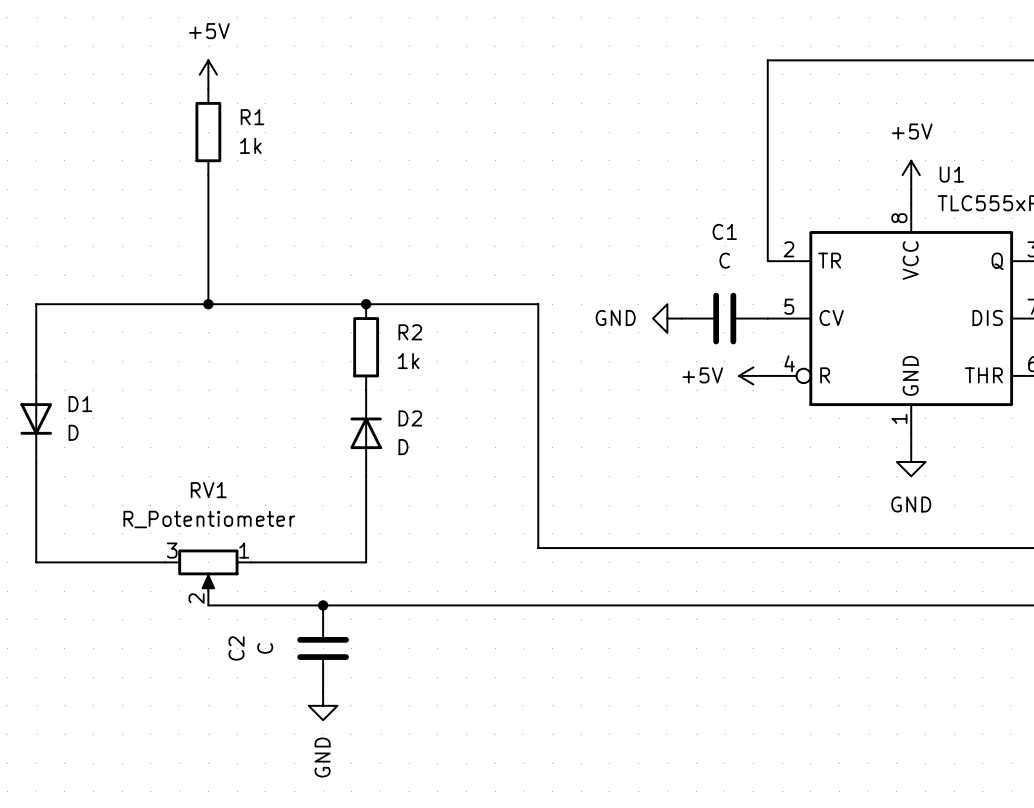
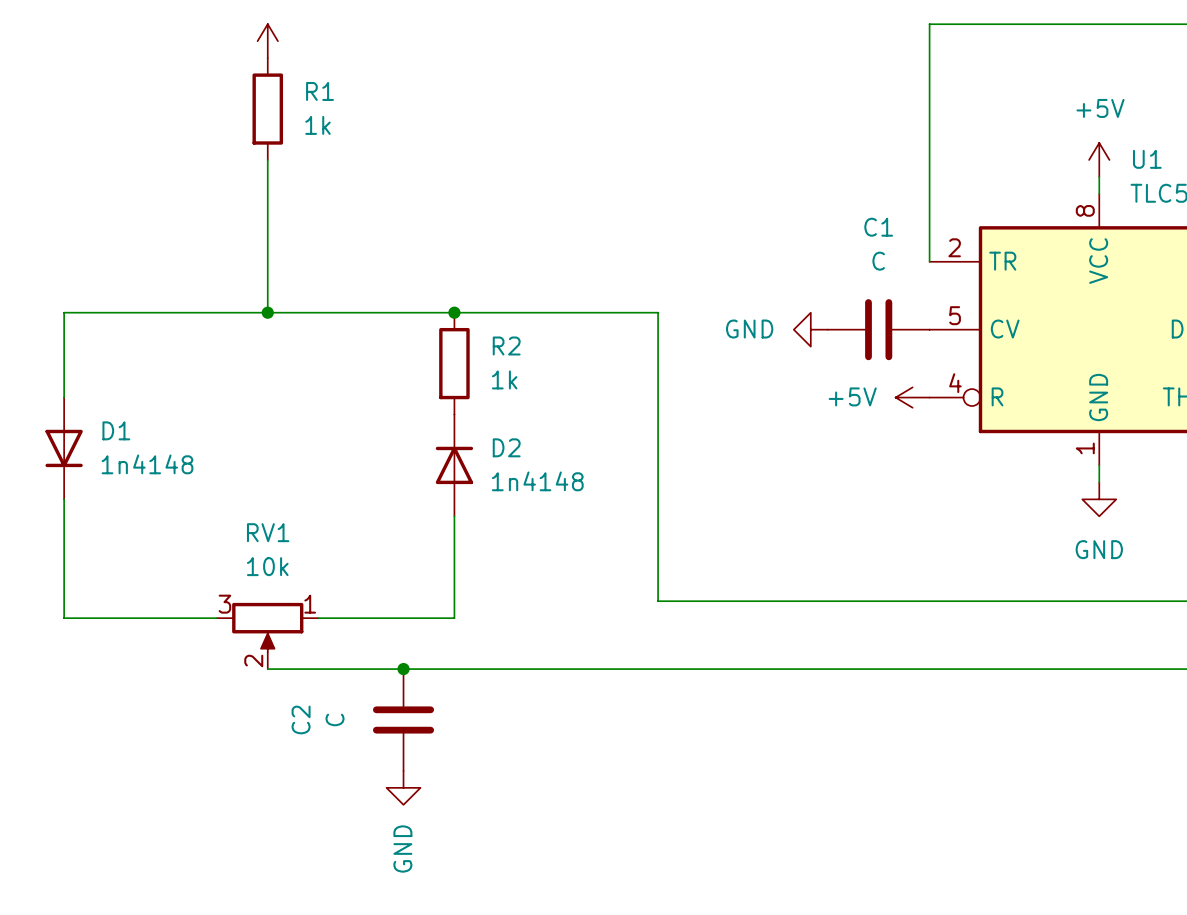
D1 value: D (73, 432) -> 1n4148 (147, 464)
D2 value: D (403, 447) -> 1n4148 (537, 481)
RV1 value: R_Potentiometer (209, 519) -> 10k (267, 566)

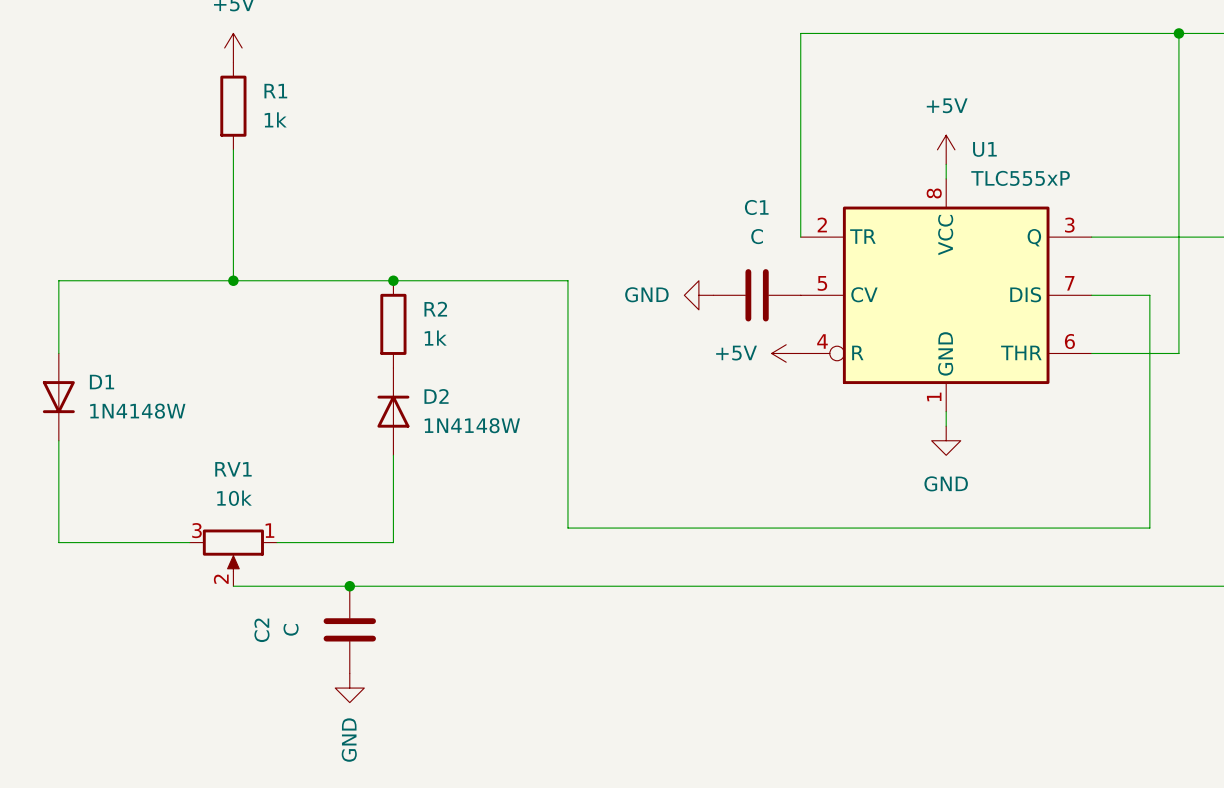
D1 value: 1n4148 (147, 464) -> 1N4148W (137, 411)
D2 value: 1n4148 (537, 481) -> 1N4148W (472, 425)

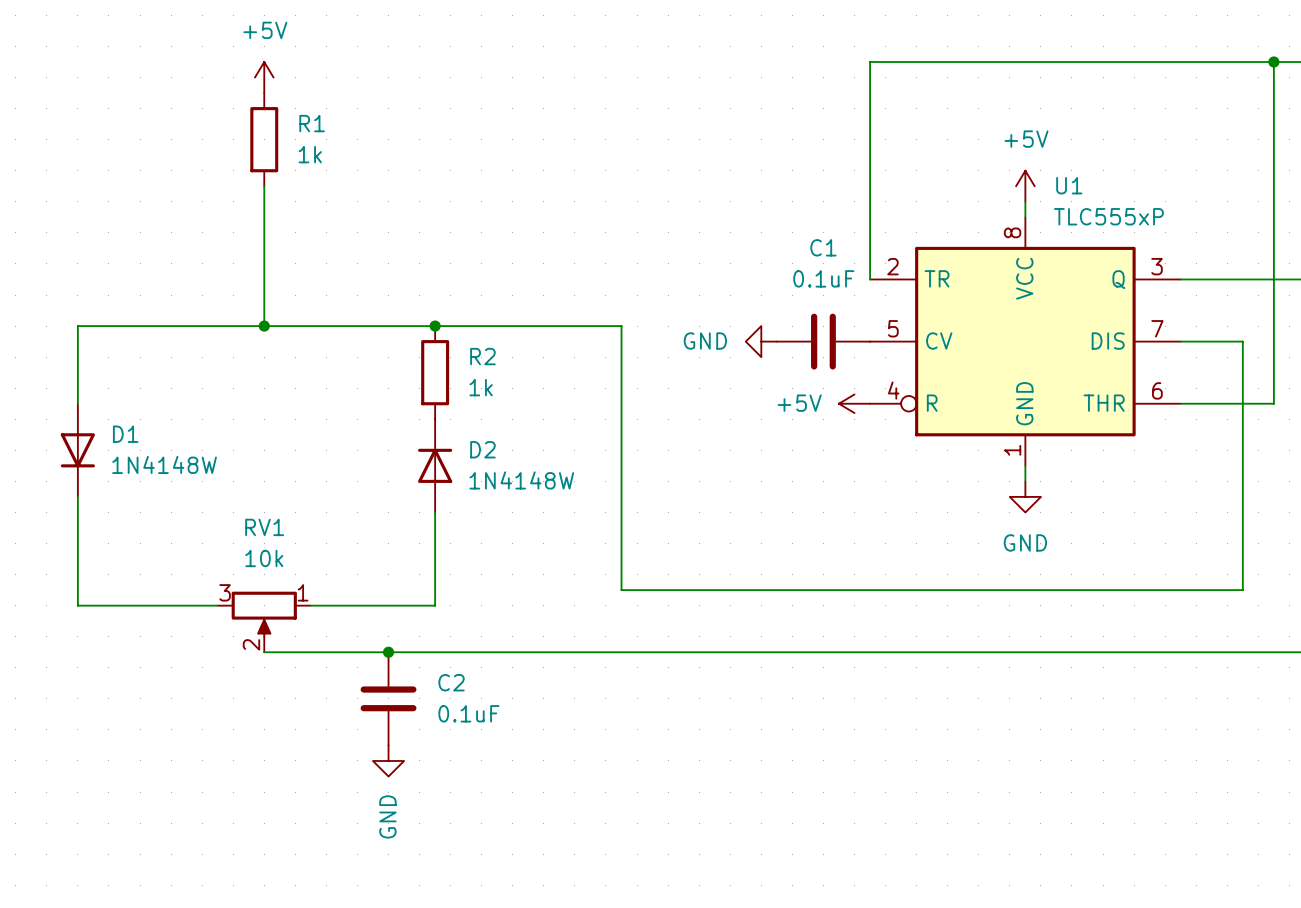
C1 value: C (757, 236) -> 0.1uF (823, 278)
C2 value: C (291, 629) -> 0.1uF (468, 713)
C2 name rotation: 0° (261, 630) -> 90° clockwise (451, 682)
C2 name position: C2 (261, 630) -> C2 (451, 682)

